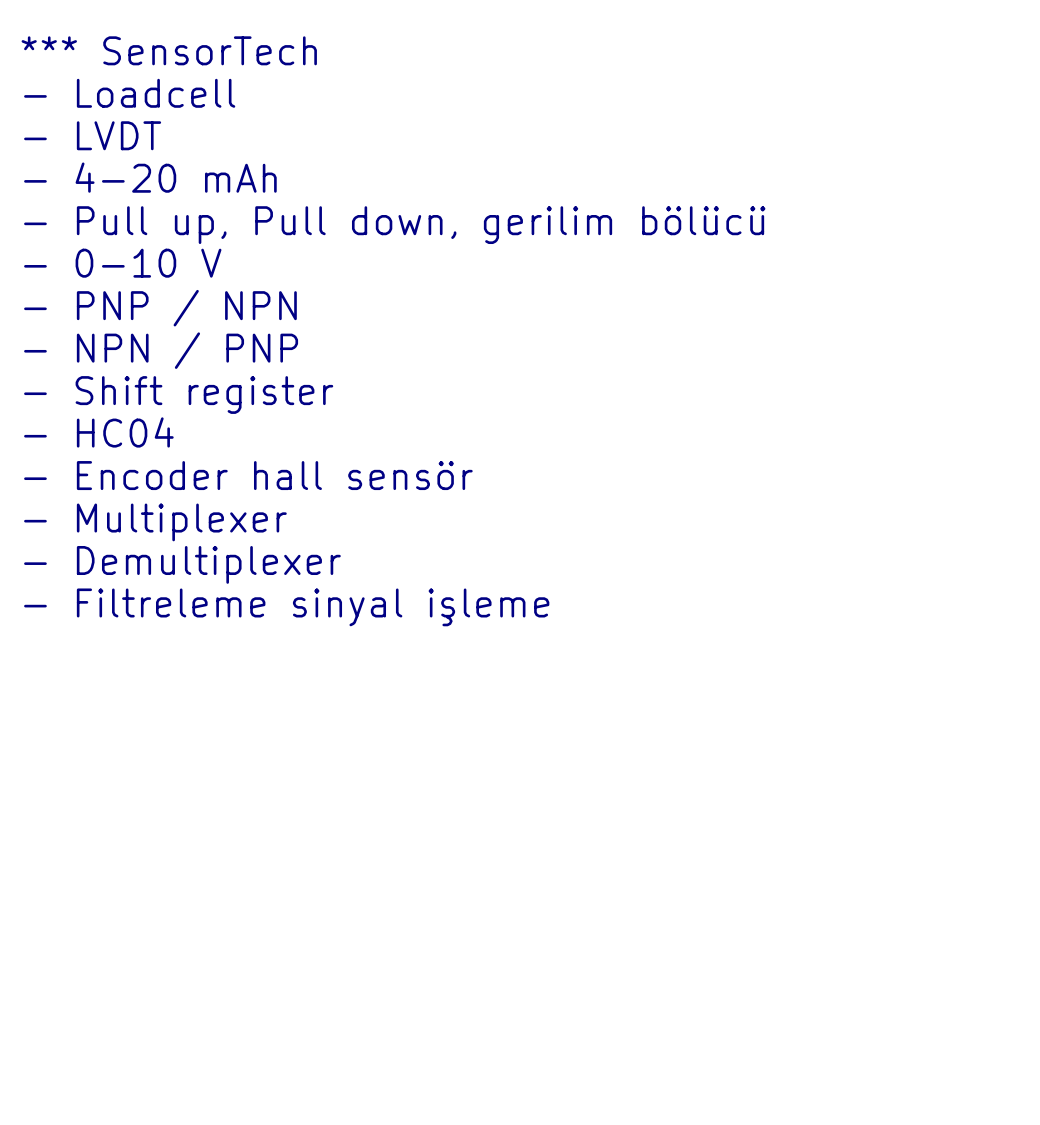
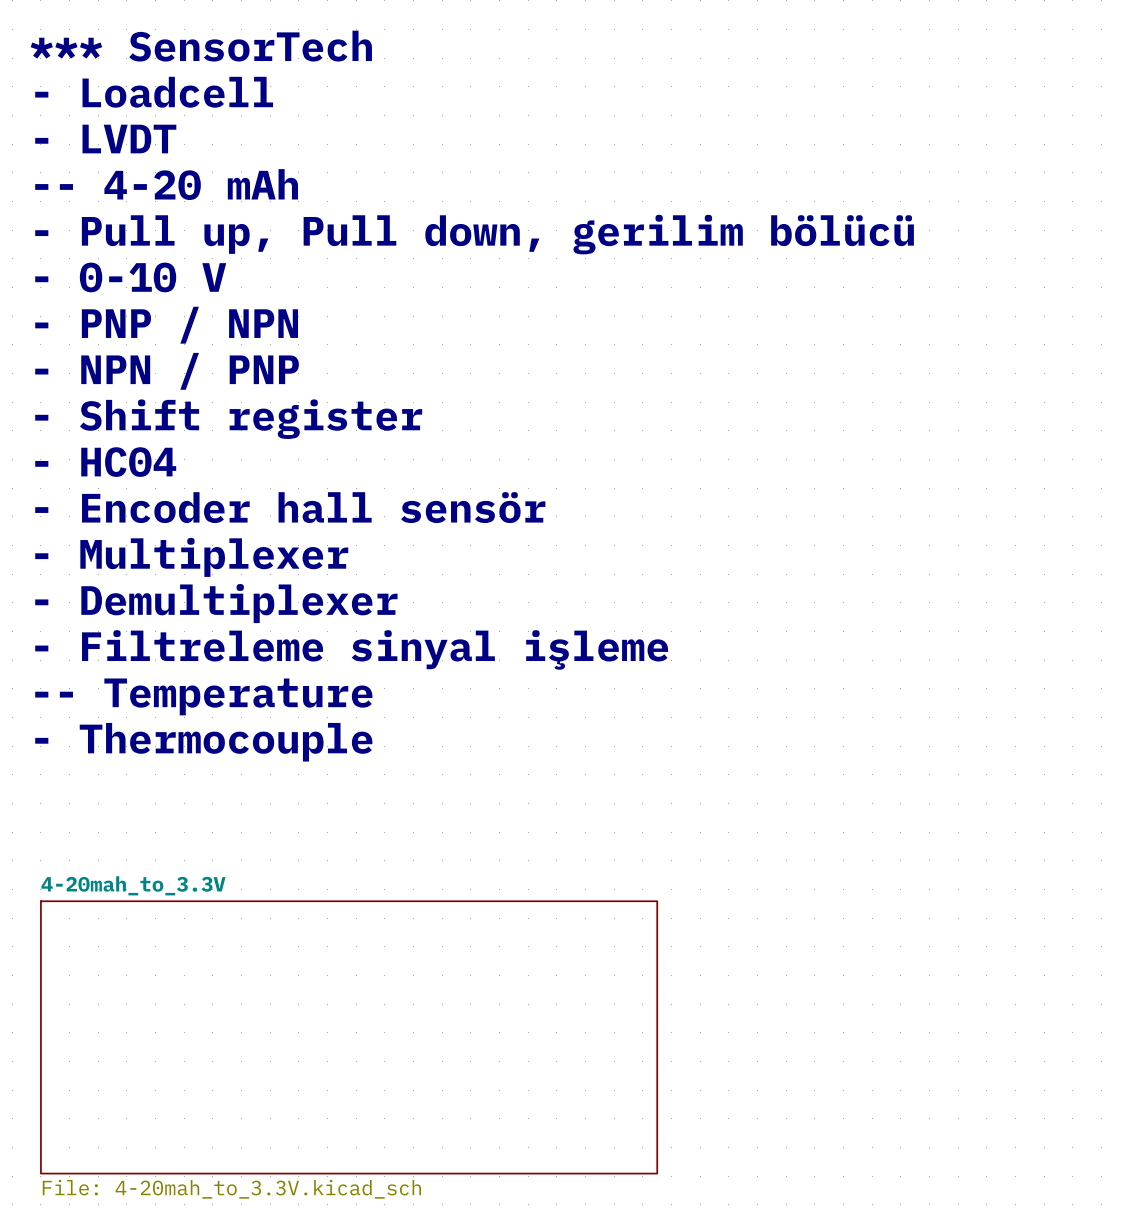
text: - 4-20 mAh (150, 177) -> -- 4-20 mAh (166, 184)
text: none -> -- Temperature (203, 696)
text: none -> - Thermocouple (203, 742)
sheet 4-20mah_to_3.3V: none -> File: 4-20mah_to_3.3V.kicad_sch (349, 1037)

